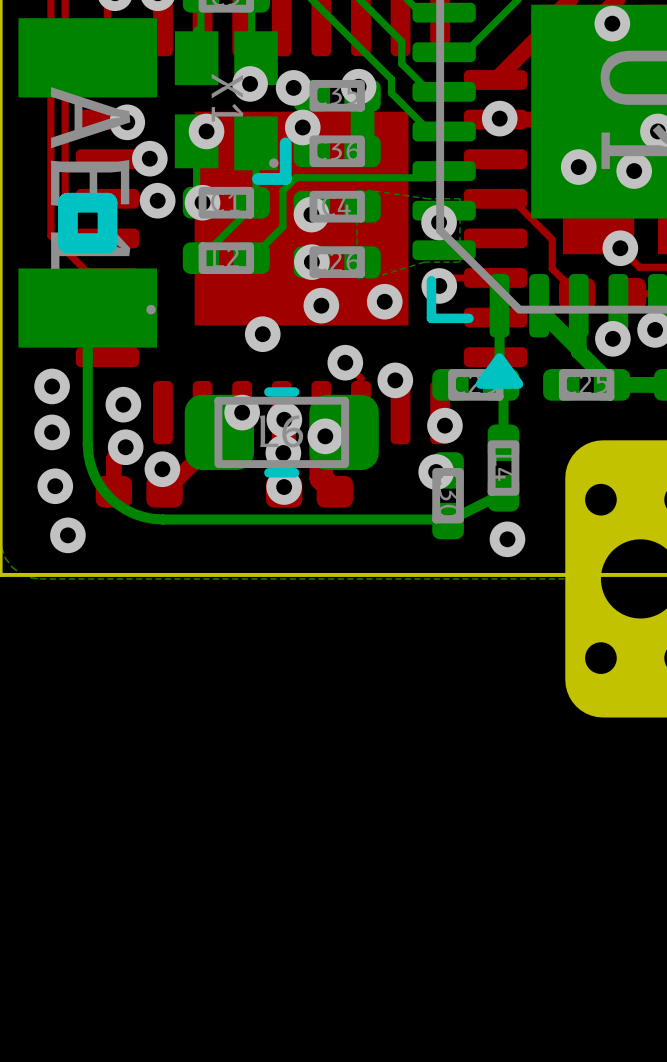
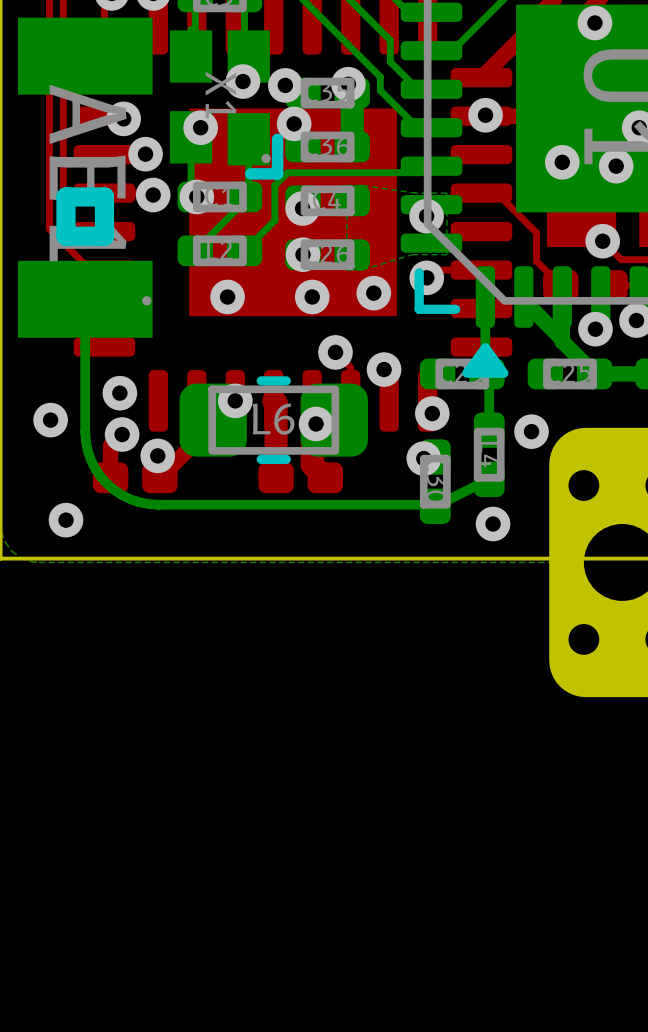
via position: (262, 334) -> (227, 296)
via: (52, 386) -> none
via: (284, 419) -> none
via: none -> (531, 431)
via: (283, 452) -> none
via: (55, 486) -> none
via: (284, 487) -> none

